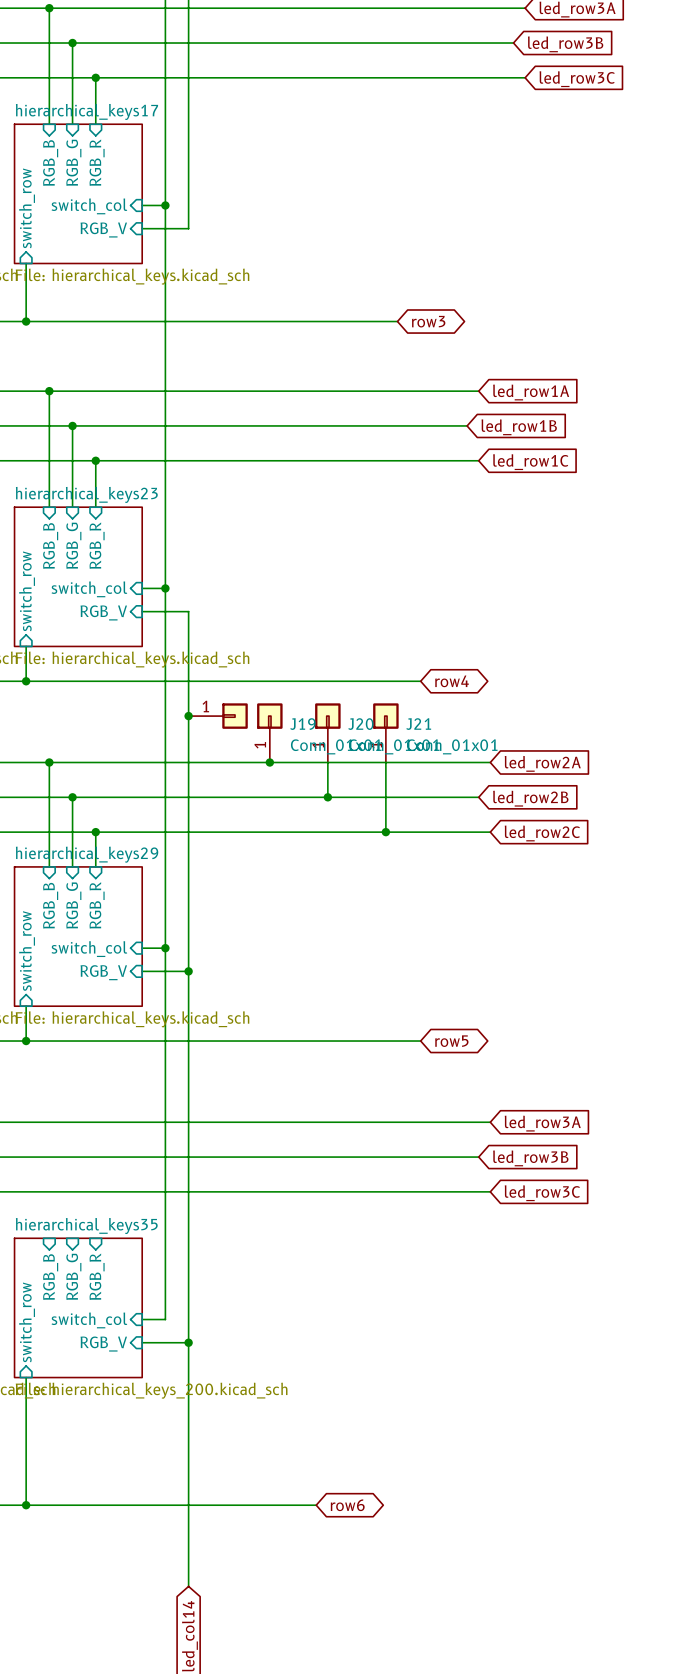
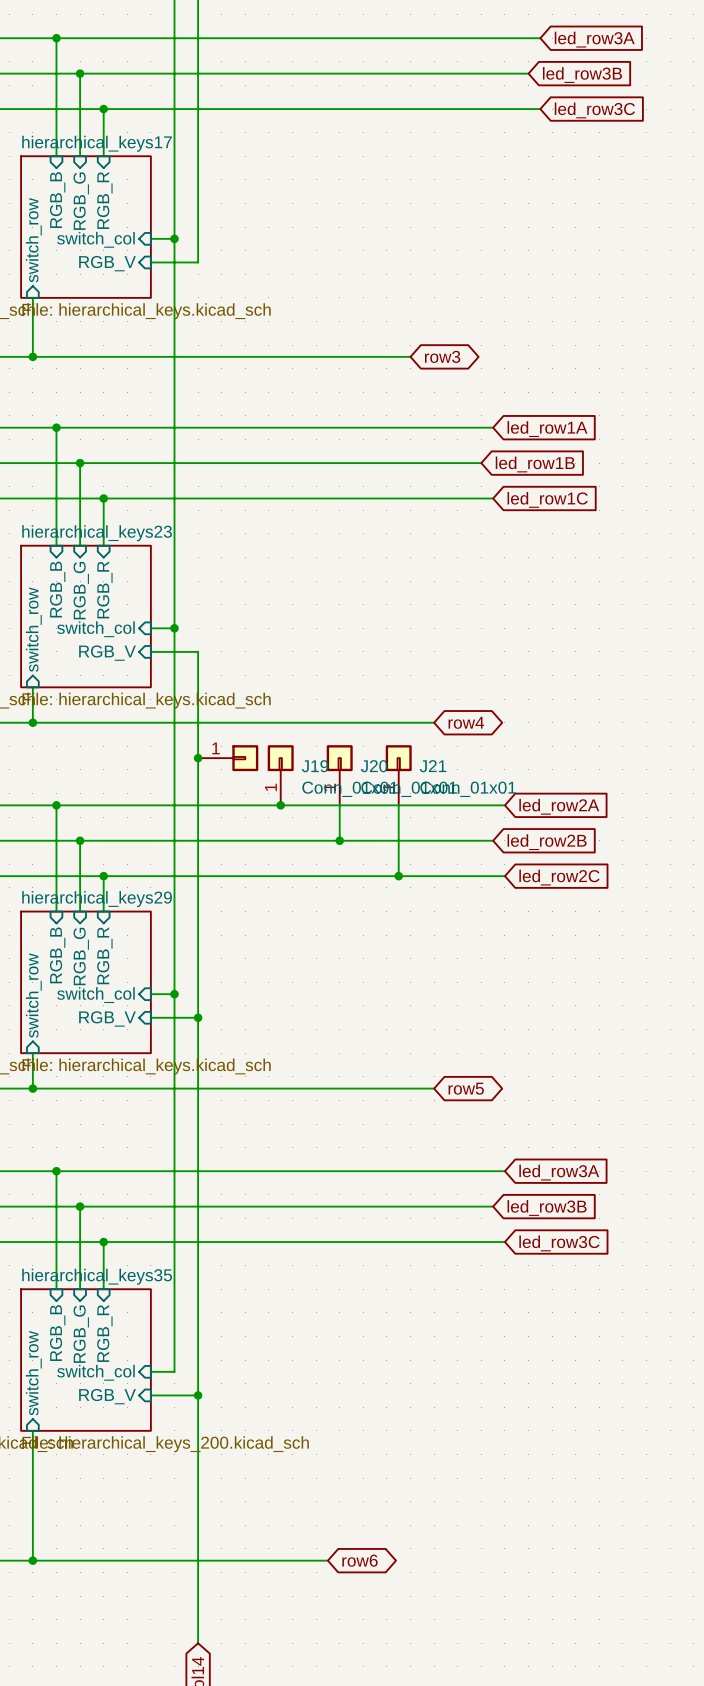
wire: none -> (56, 1171) (56, 1289)
junction: none -> (56, 1171)
wire: none -> (80, 1206) (80, 1289)
junction: none -> (80, 1206)
wire: none -> (103, 1242) (103, 1289)
junction: none -> (103, 1242)

